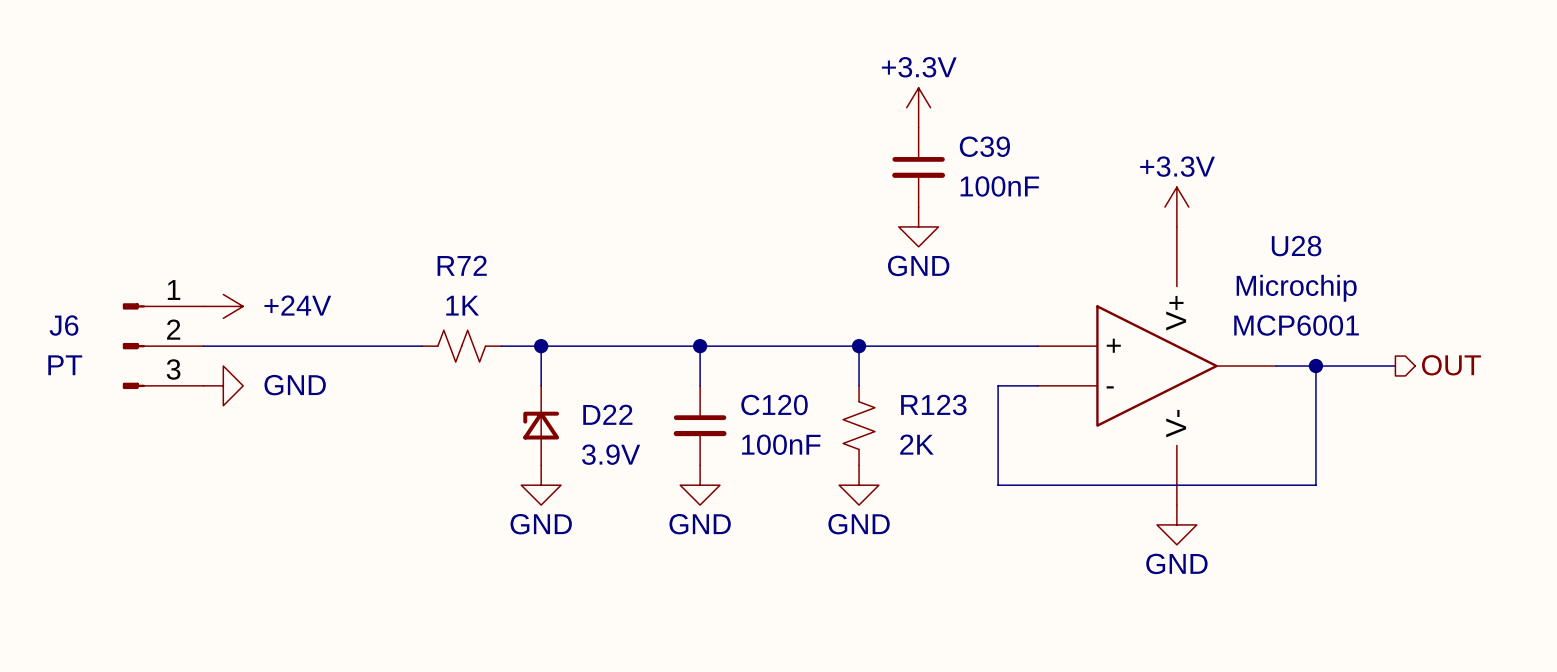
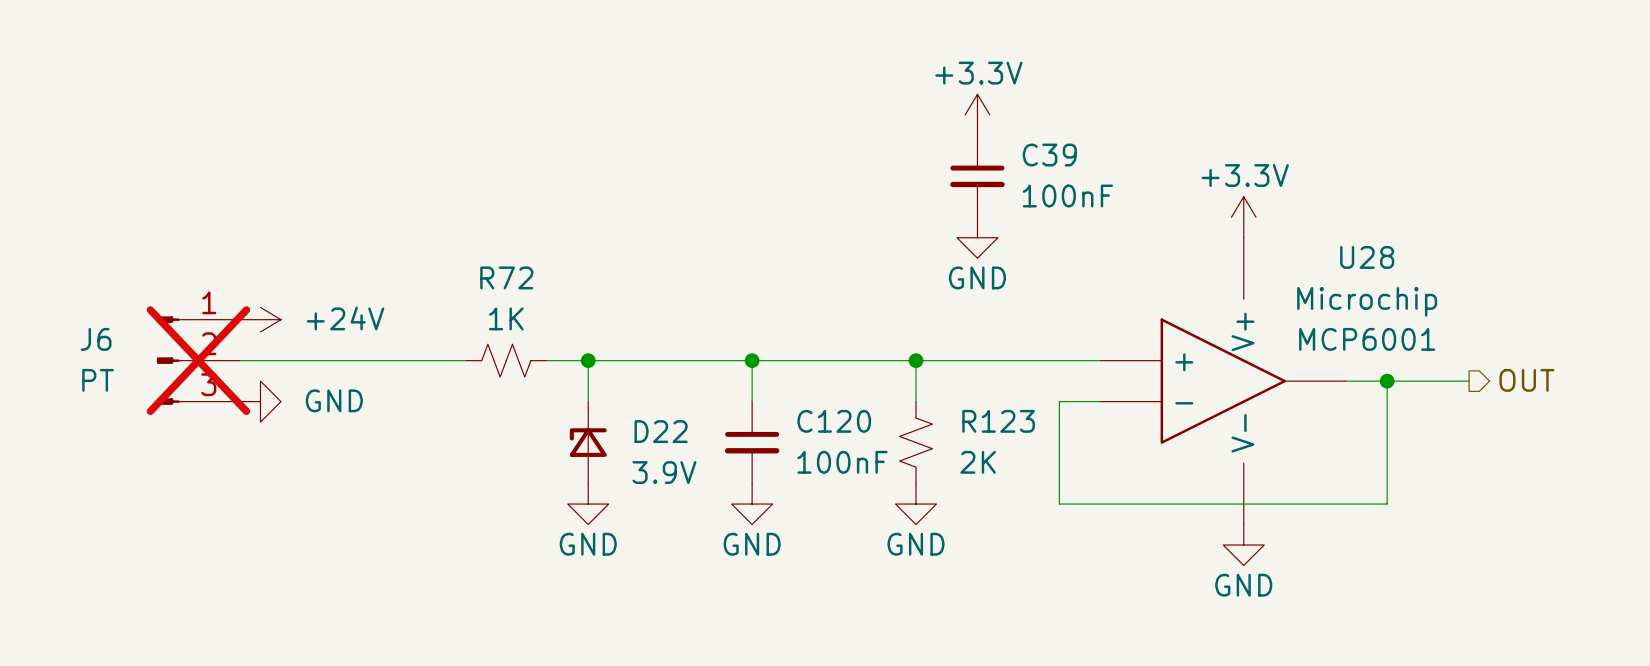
J6 do-not-place cross: none -> (198, 360)

